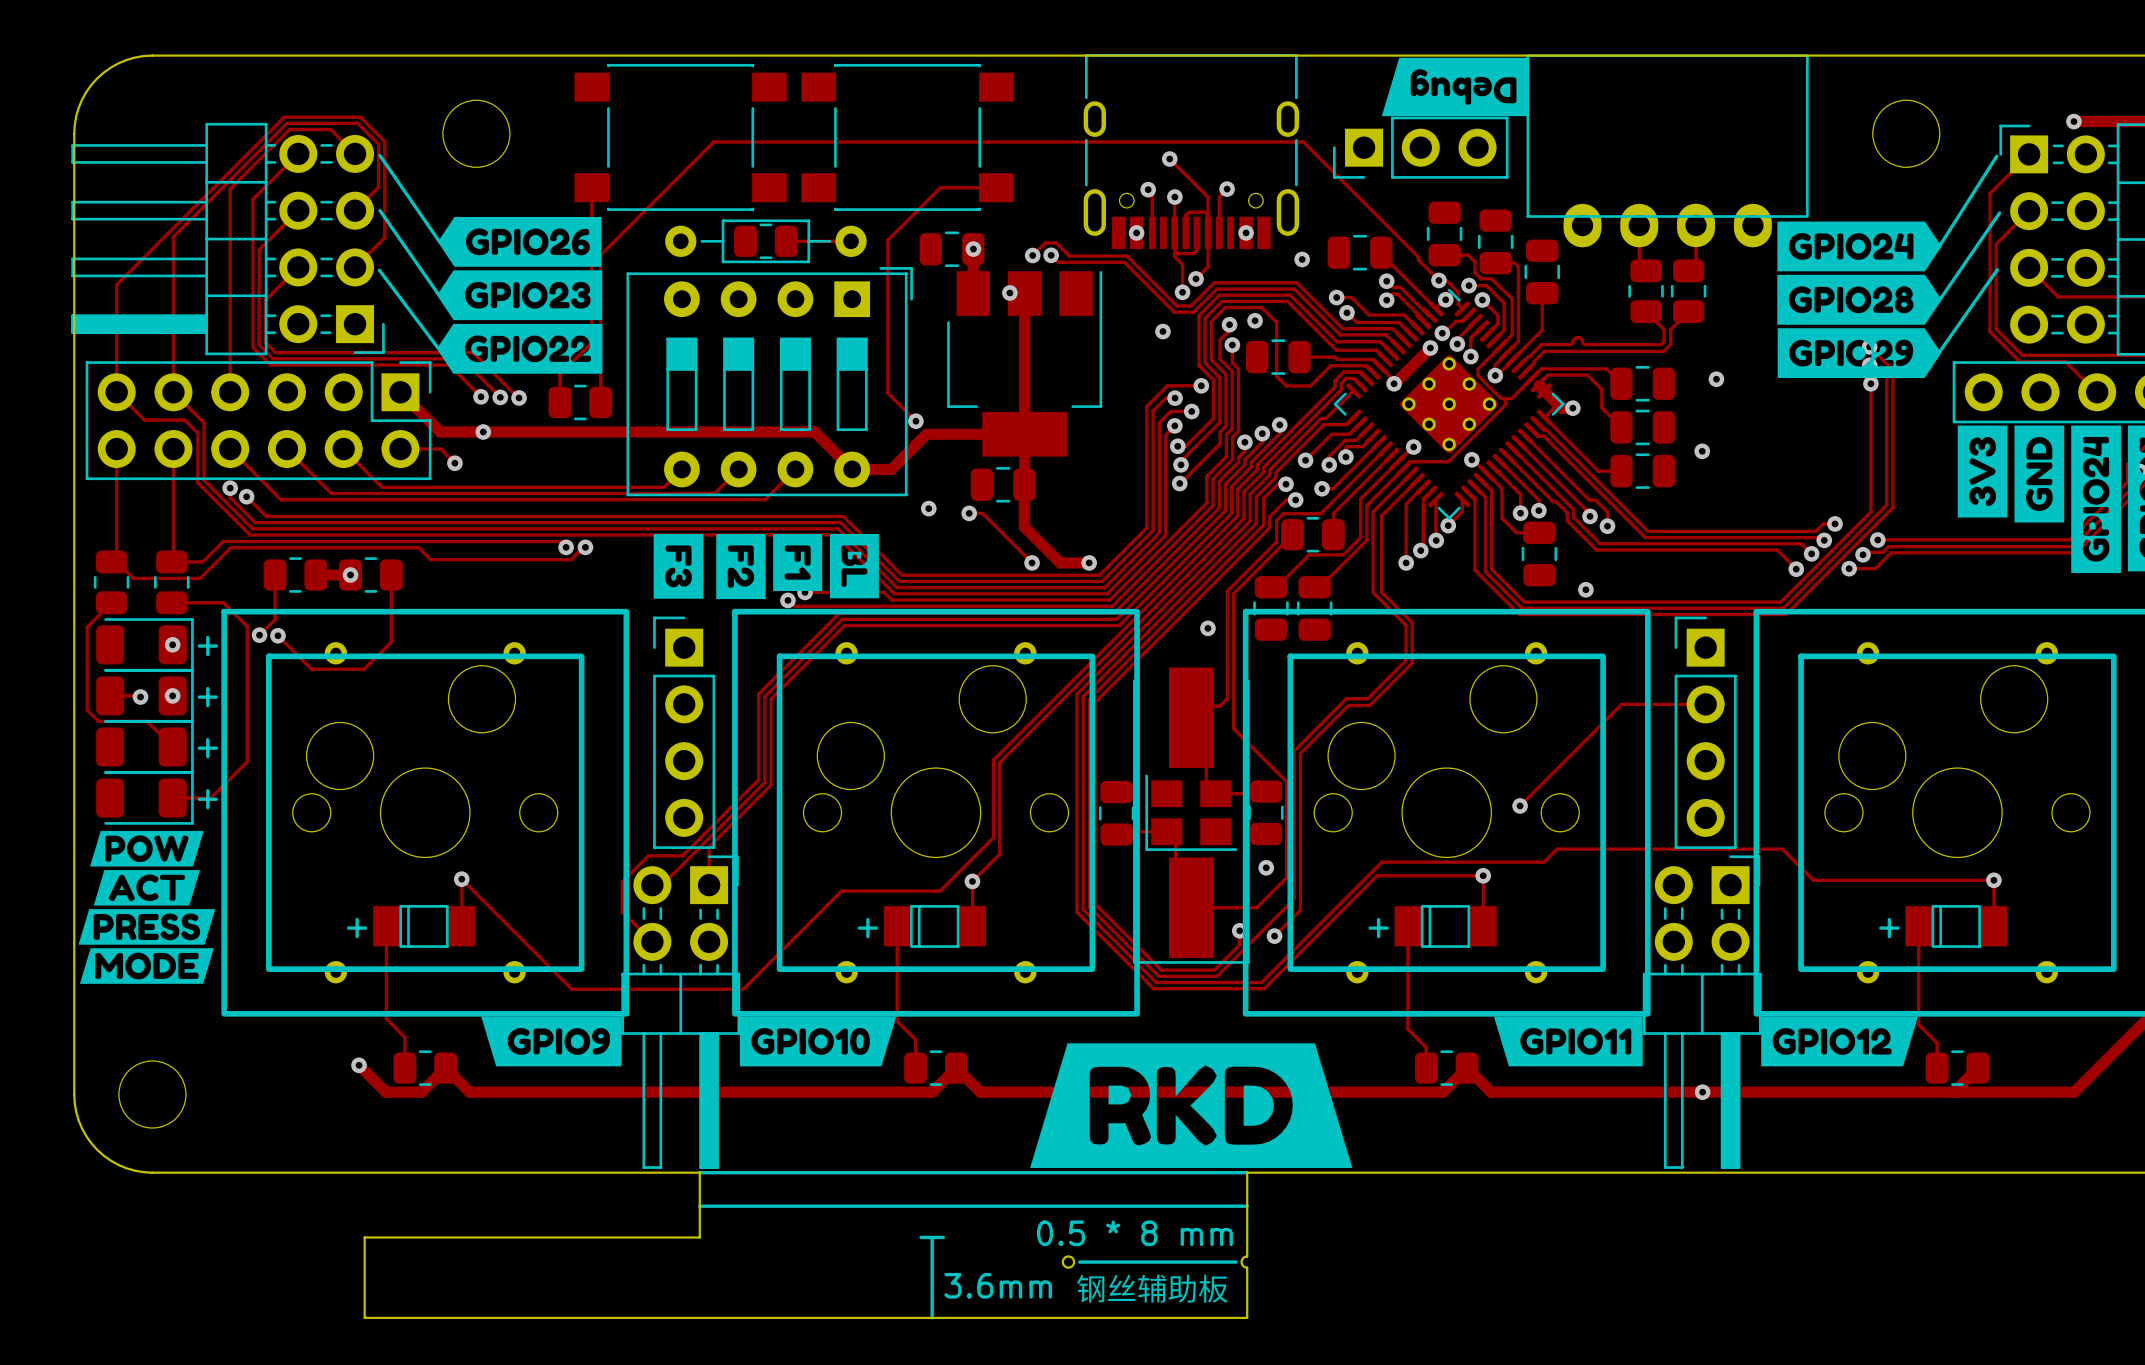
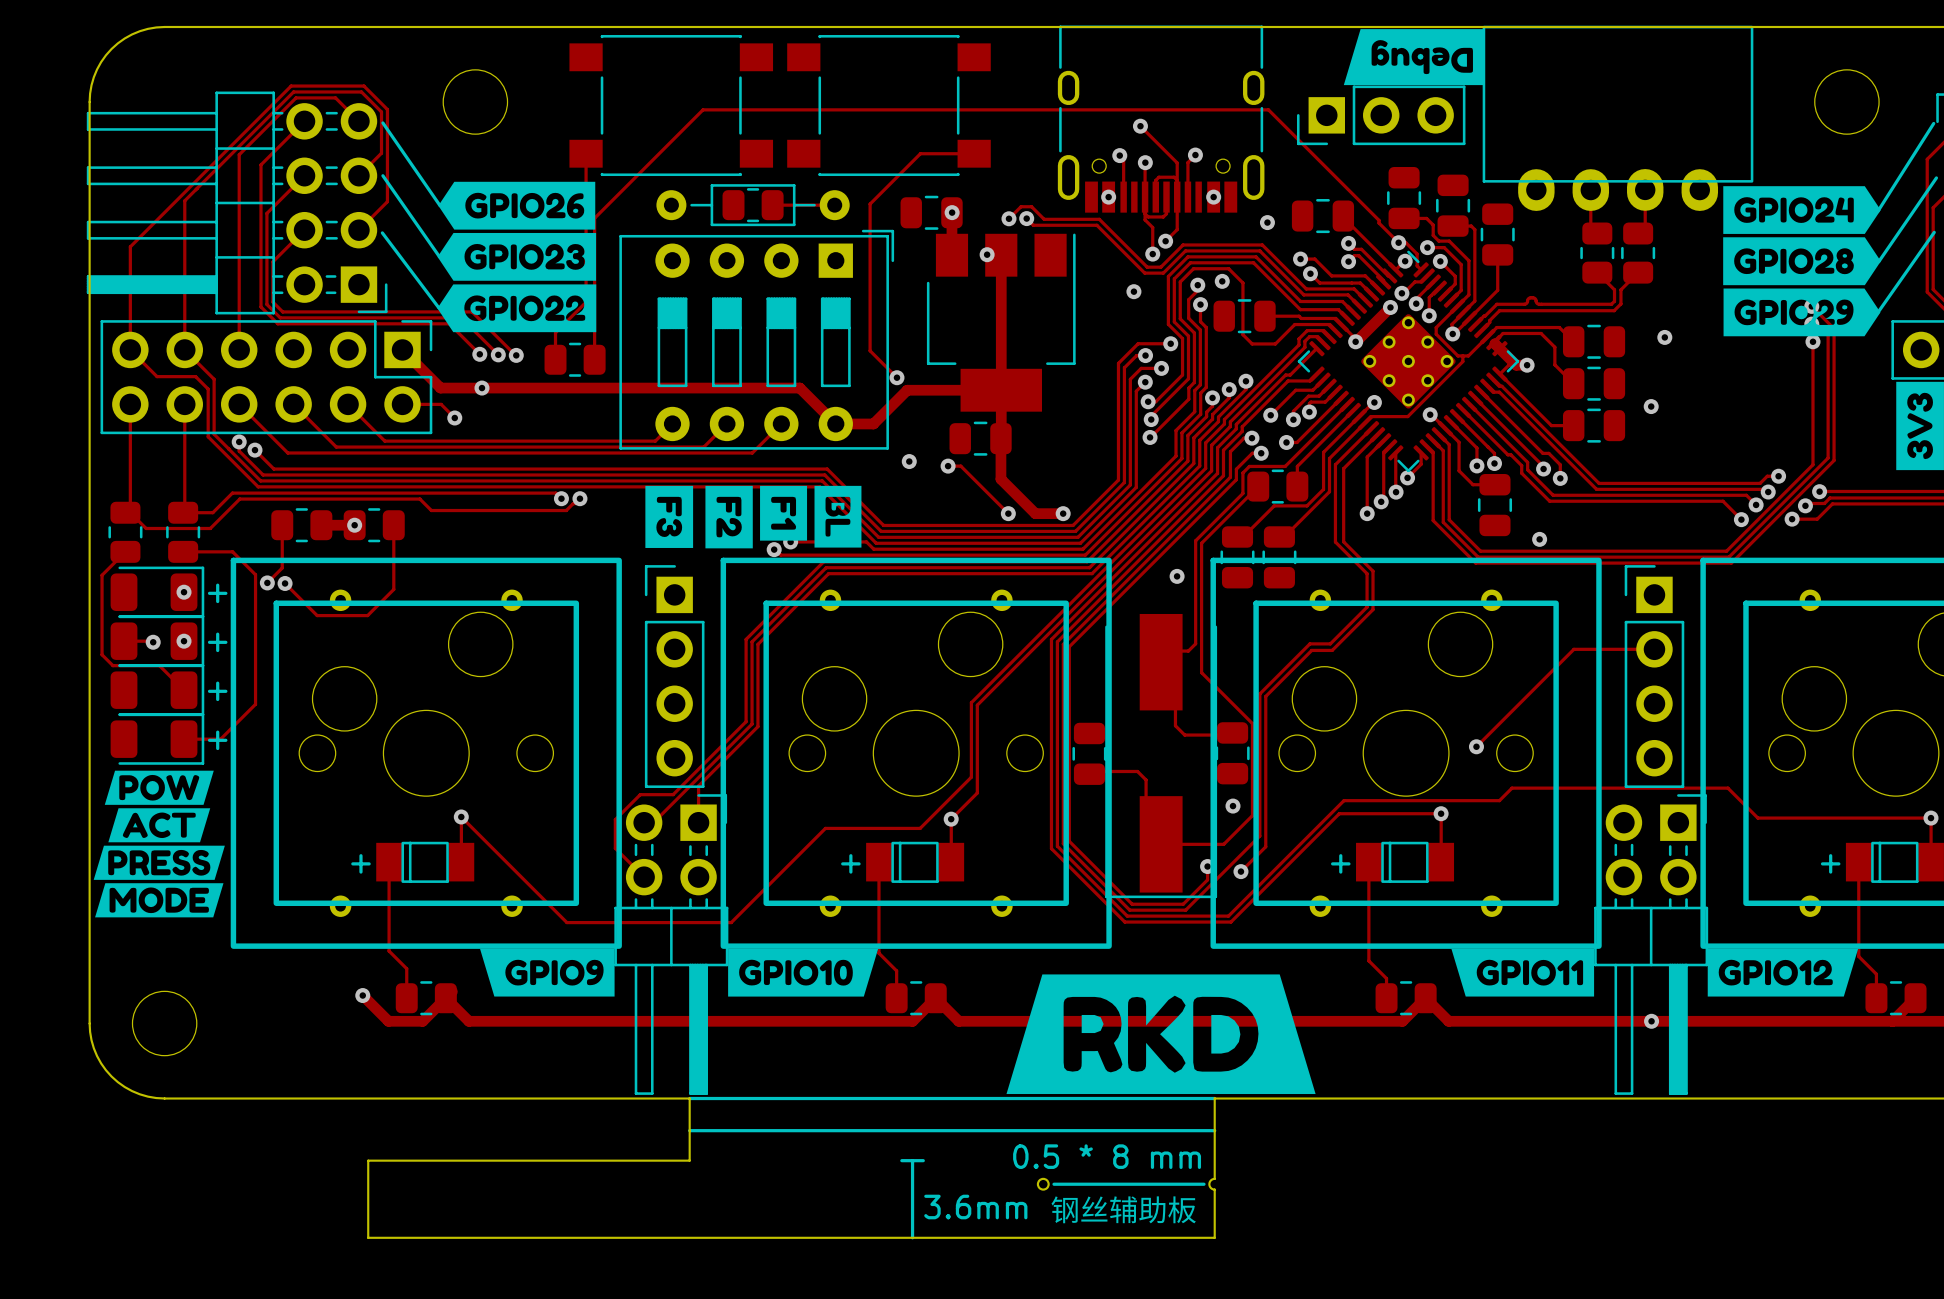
part: (1191, 812) -> none

